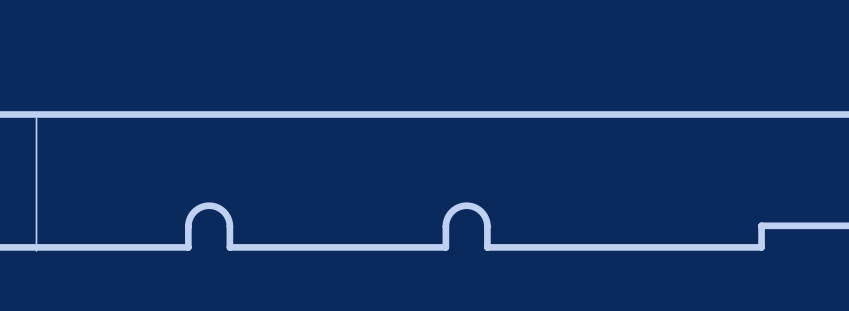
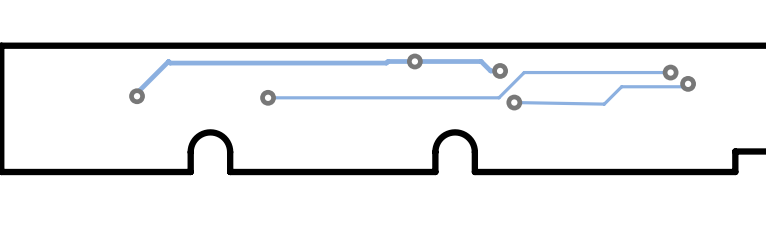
board edge: (36, 118) (36, 251) -> none
via: none -> (414, 61)
track: none -> (500, 70) (490, 70) (481, 61) (388, 61) (386, 63) (170, 63) (168, 61) (137, 93) (135, 97)
via: none -> (500, 70)
track: none -> (670, 72) (524, 72) (498, 97) (268, 97)
via: none -> (670, 72)
track: none -> (688, 83) (685, 86) (621, 86) (604, 104) (514, 102) (515, 104)
via: none -> (688, 83)
via: none -> (137, 96)
via: none -> (268, 97)
via: none -> (514, 102)

